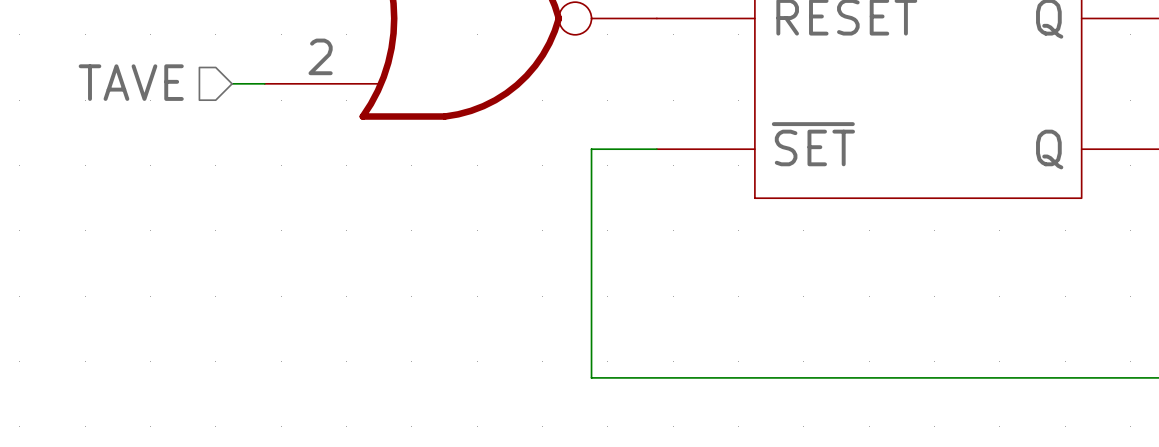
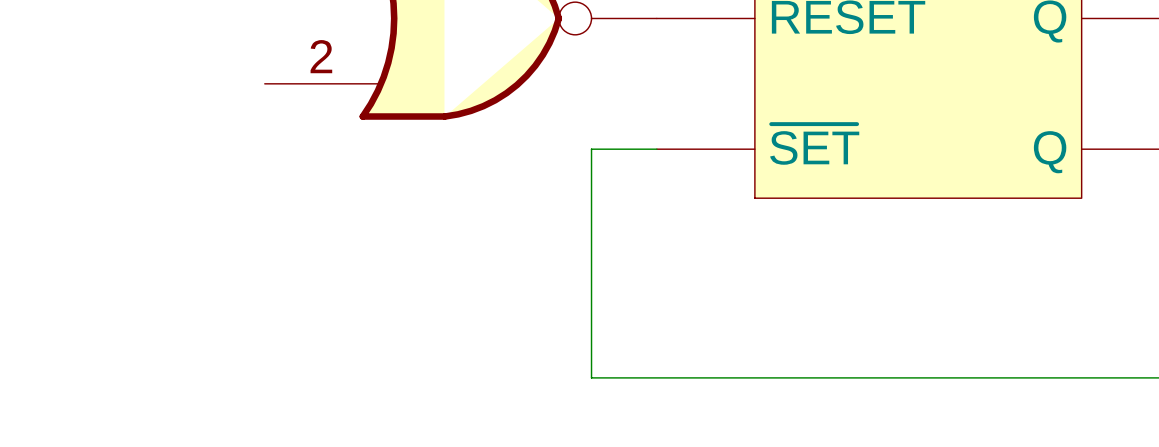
hierarchical label: TAVE (131, 82) -> none
wire: (232, 83) (264, 83) -> none

